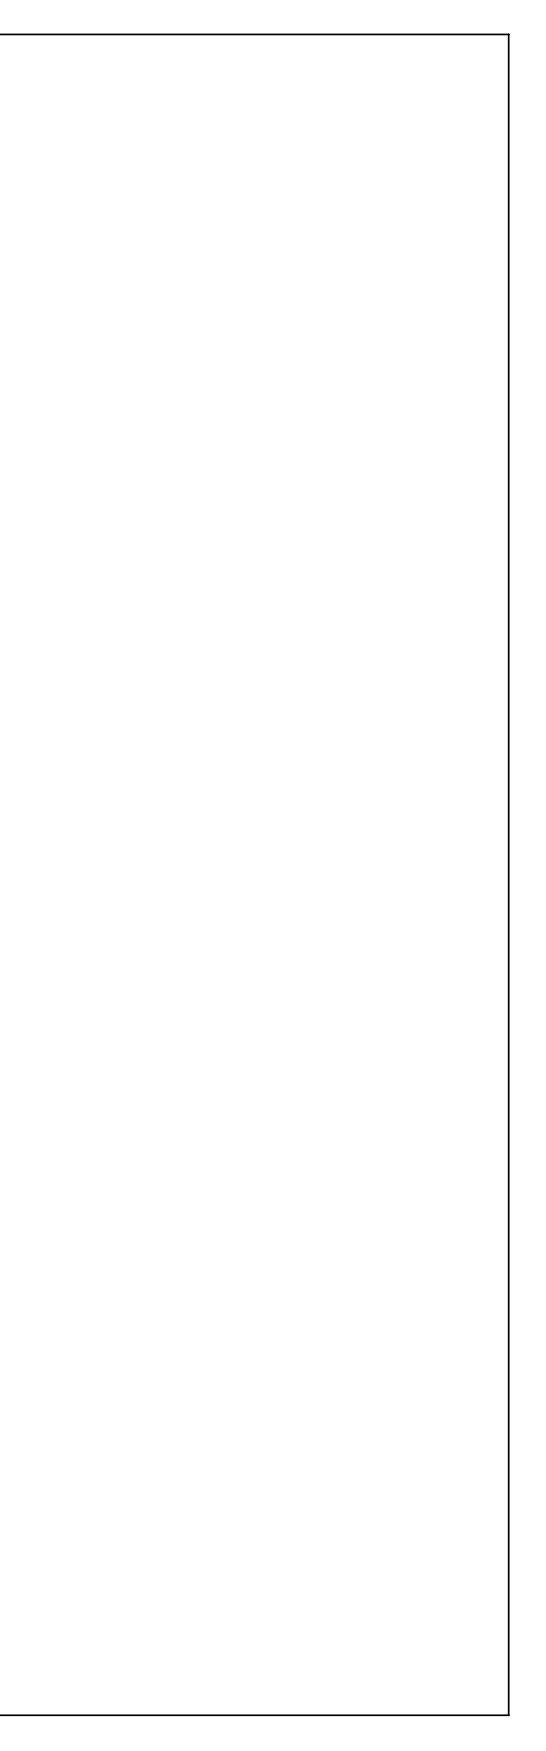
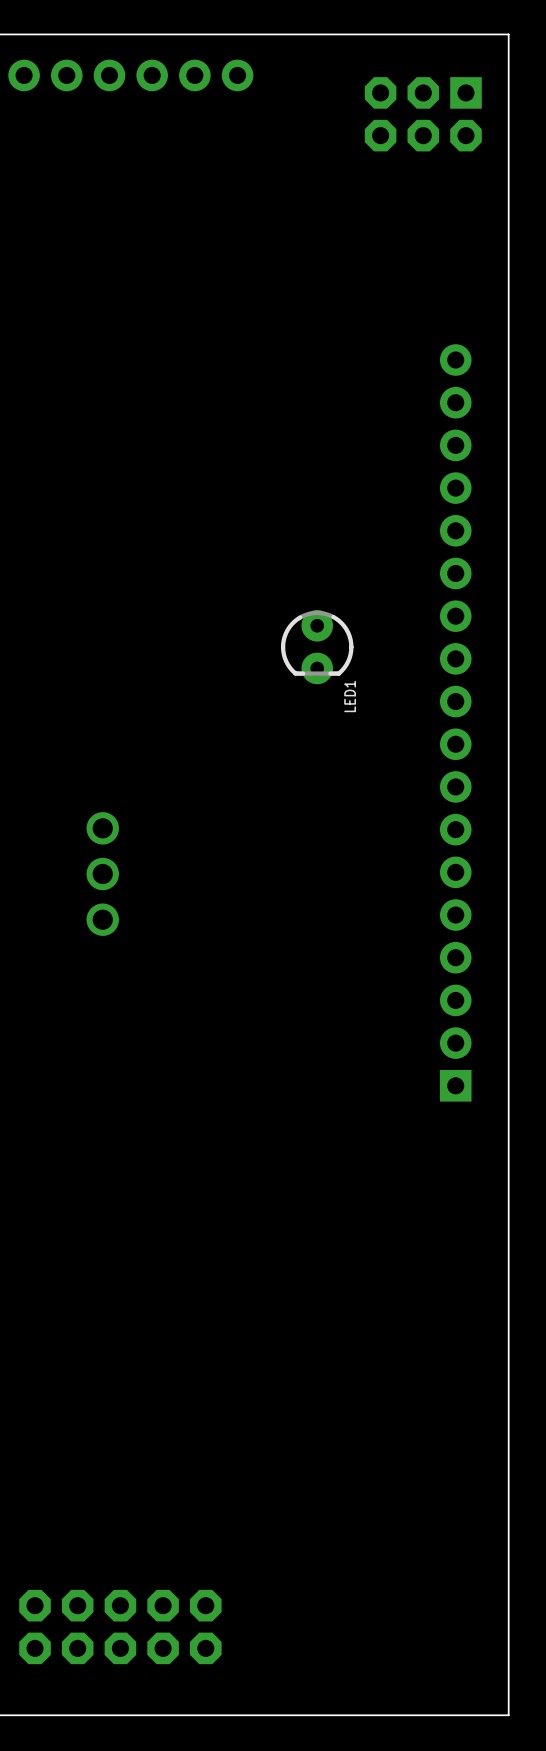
part: none -> (130, 75)
part: none -> (423, 114)
LED1: none -> (317, 647)
part: none -> (455, 722)
part: none -> (102, 874)
part: none -> (120, 1627)

